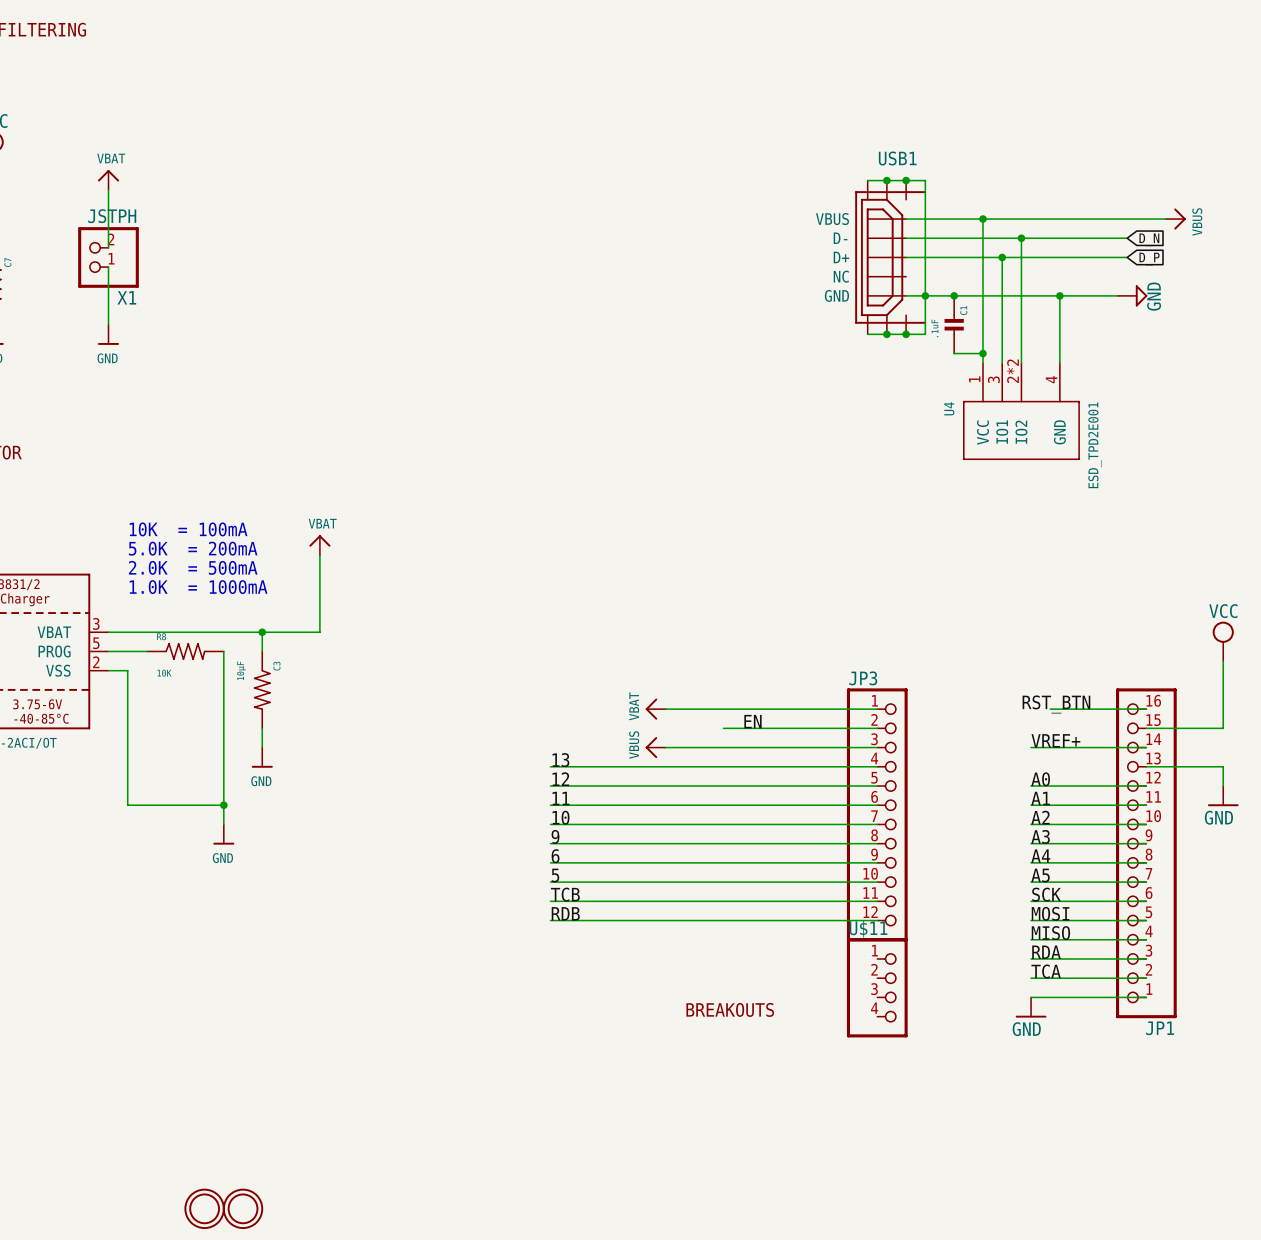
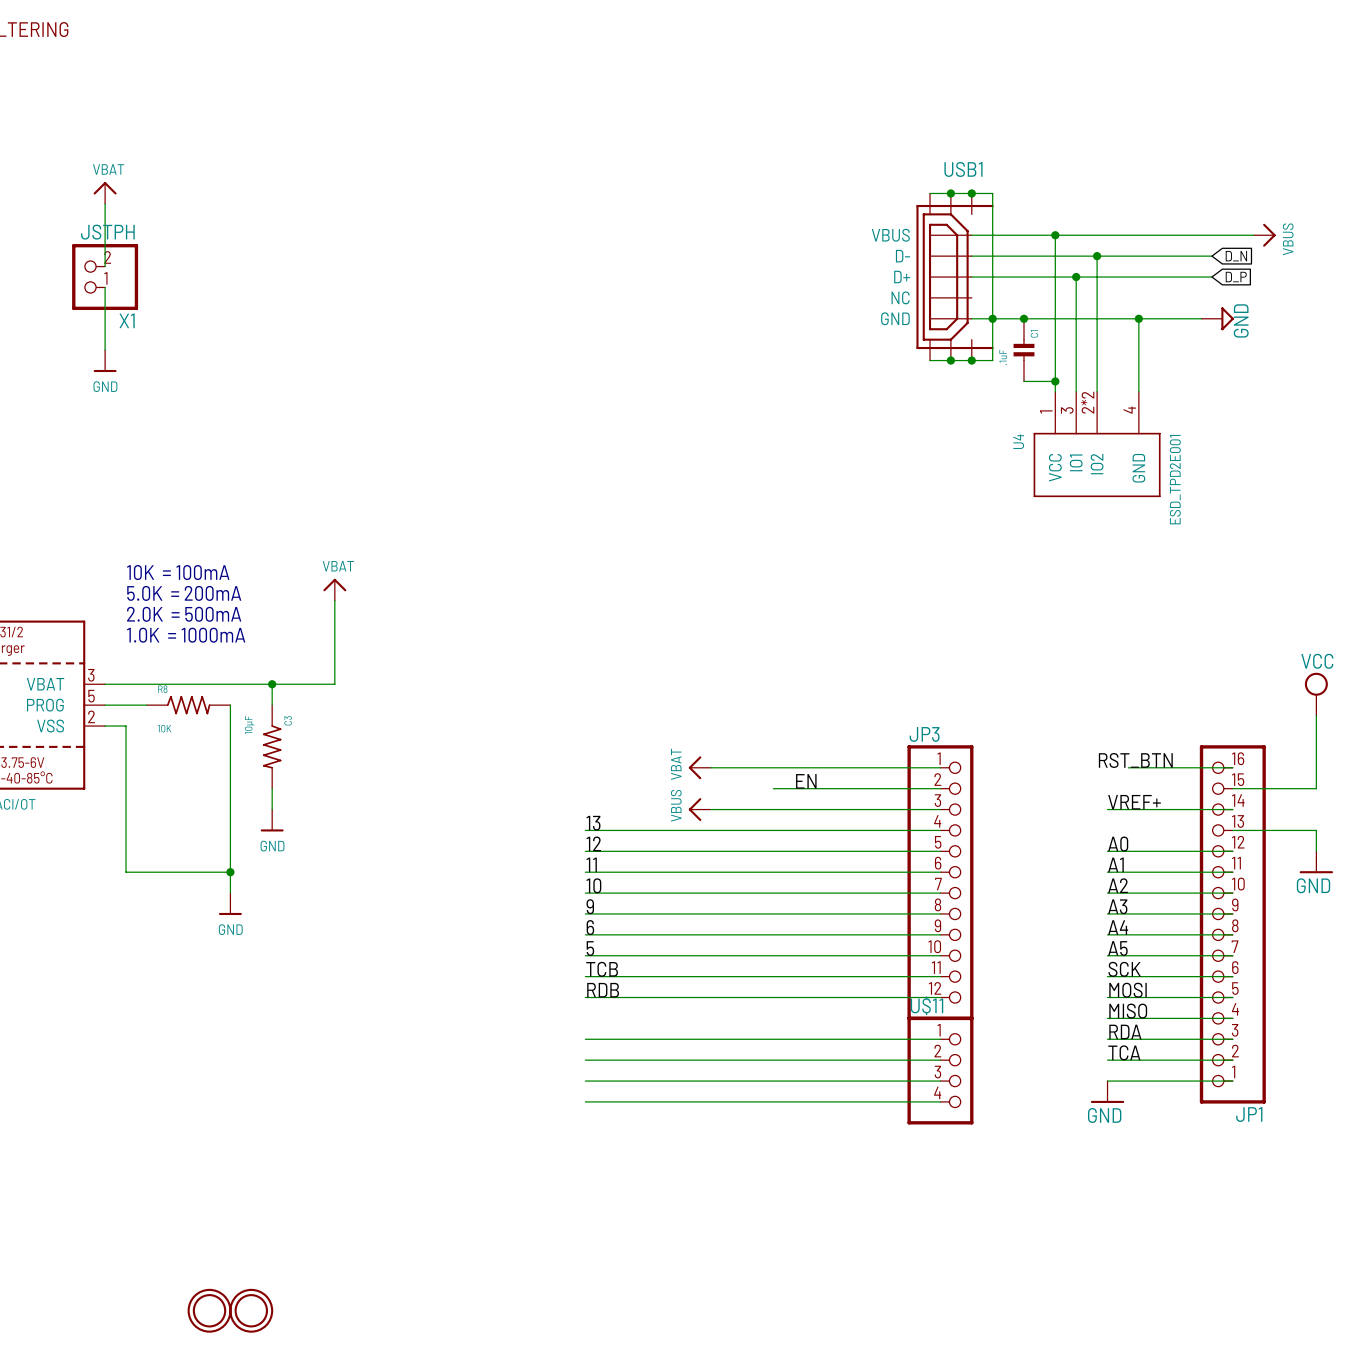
wire: none -> (585, 1039) (940, 1039)
wire: none -> (585, 1060) (940, 1060)
wire: none -> (585, 1081) (940, 1081)
text: BREAKOUTS (730, 1009) -> none
wire: none -> (585, 1101) (940, 1101)

